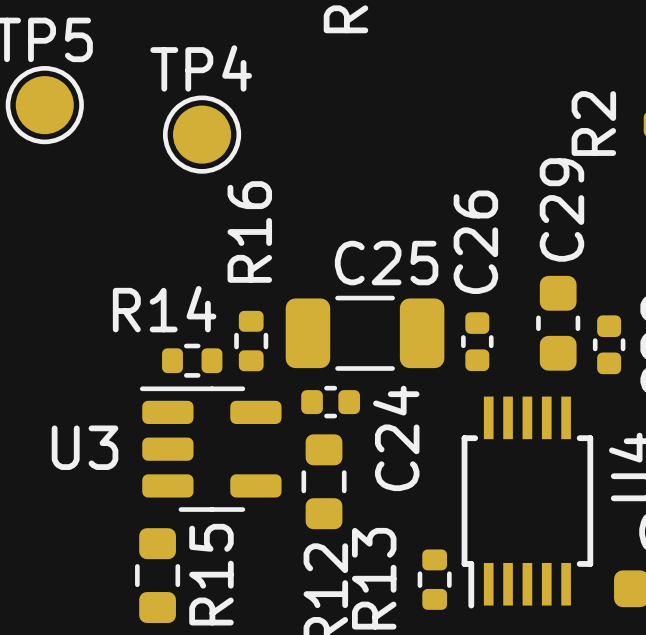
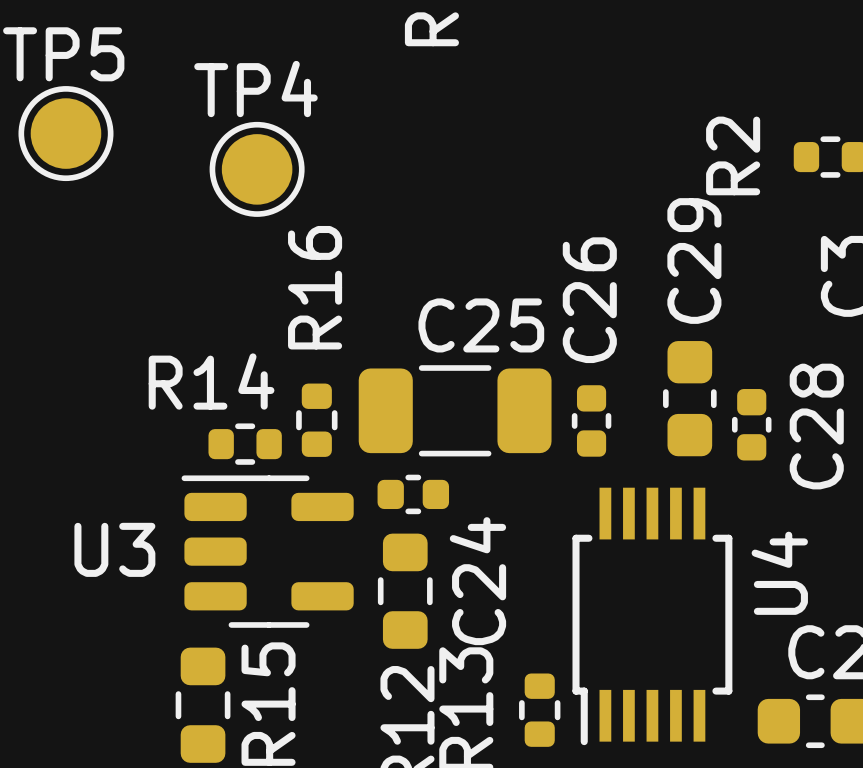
C24 name position: C24 (396, 438) -> C24 (477, 581)

